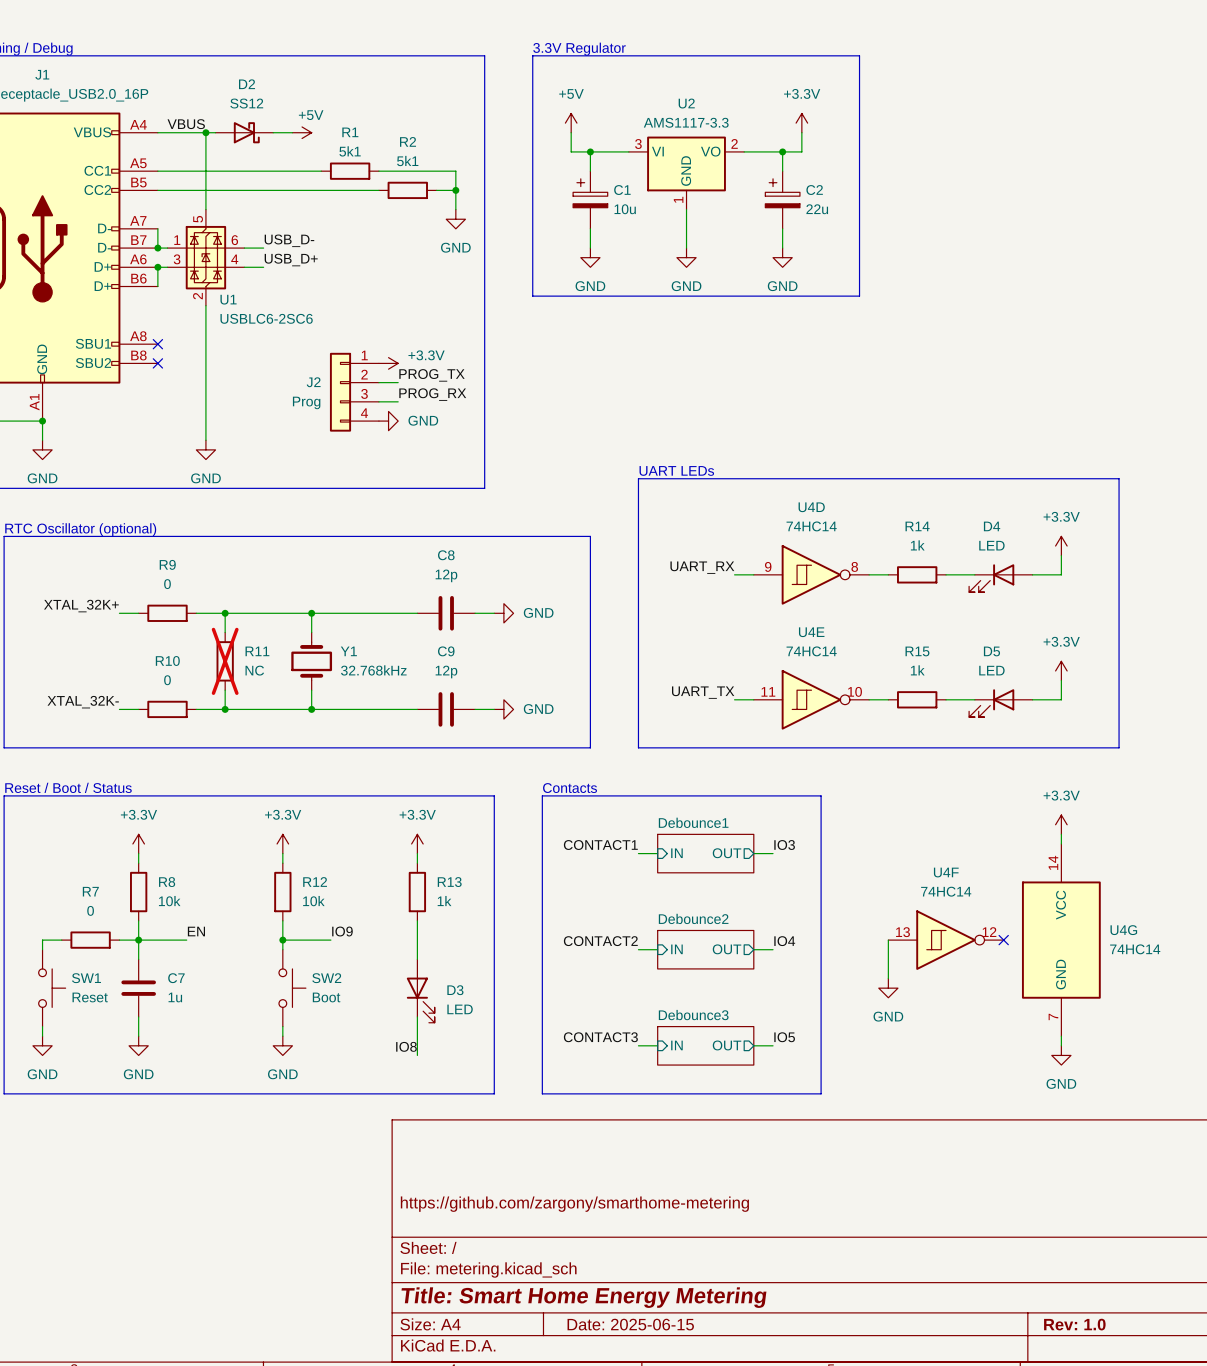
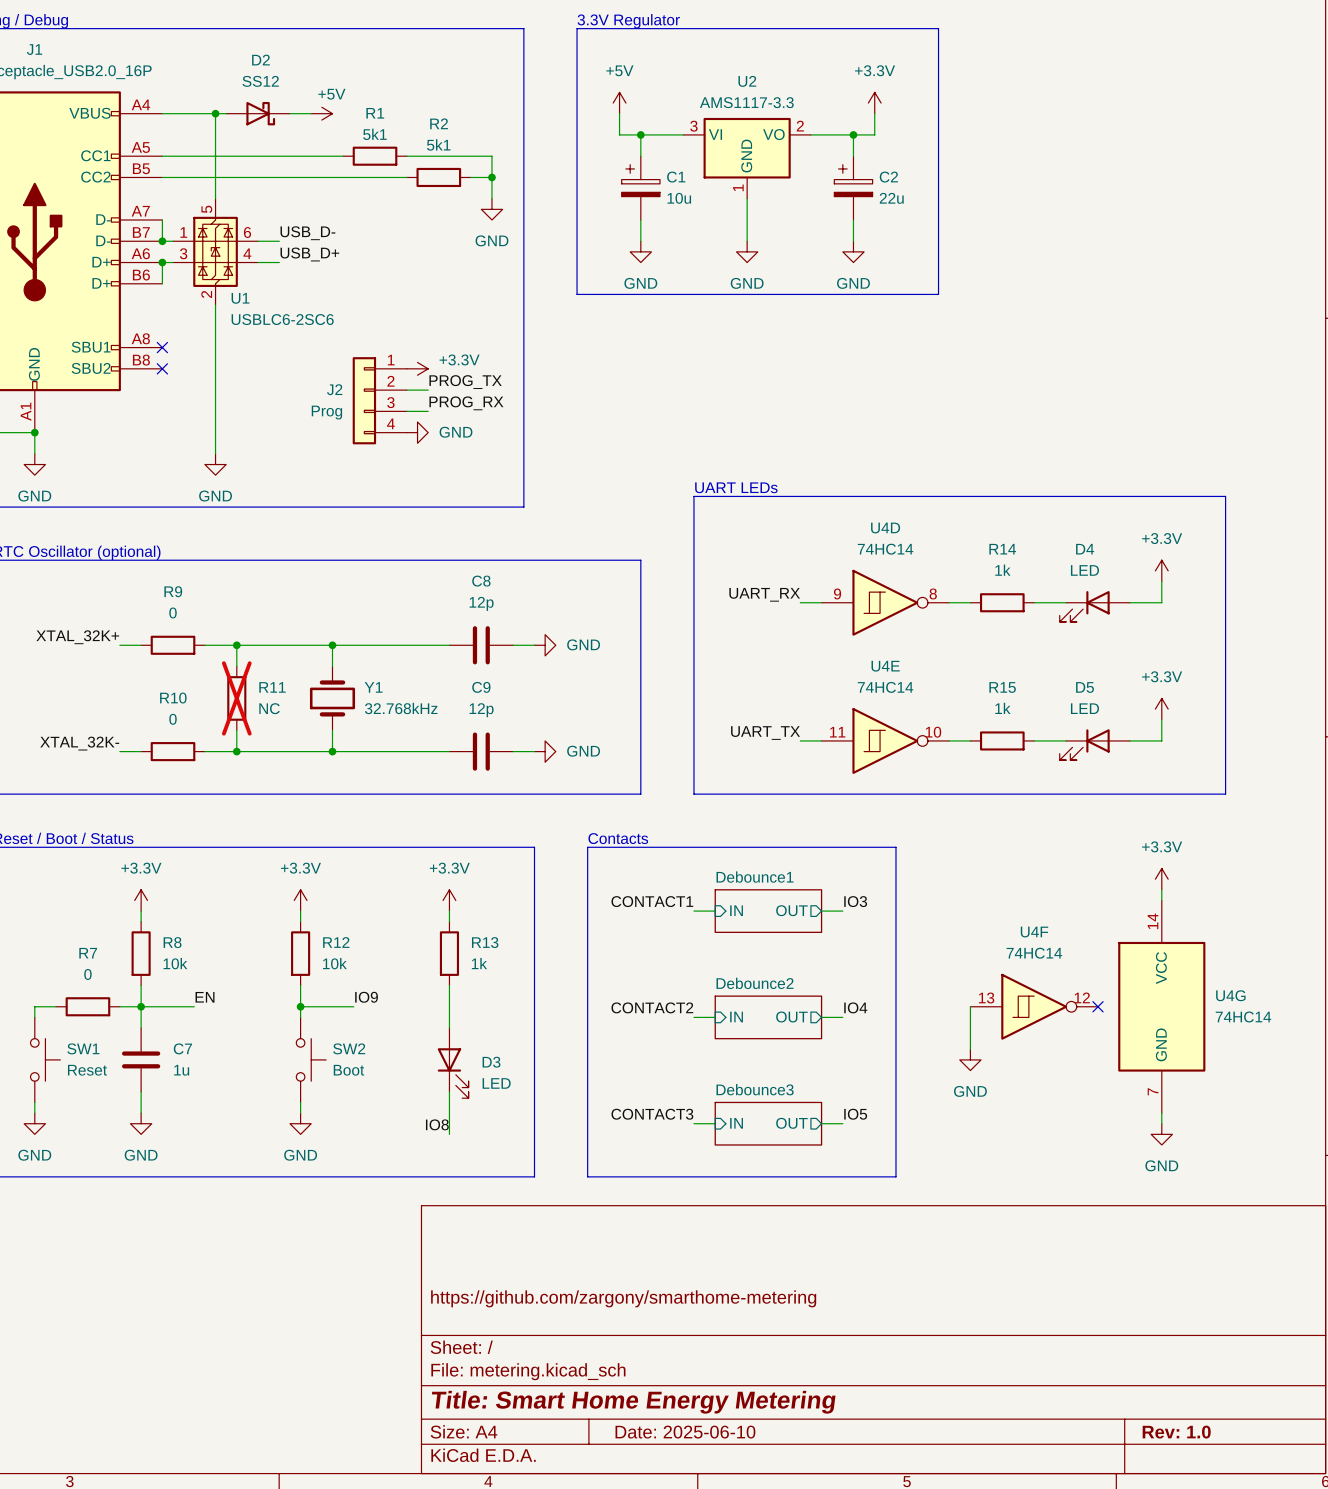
label: VBUS (186, 124) -> none
title block: Date: 2025-06-15 (630, 1324) -> Date: 2025-06-10 (685, 1432)

